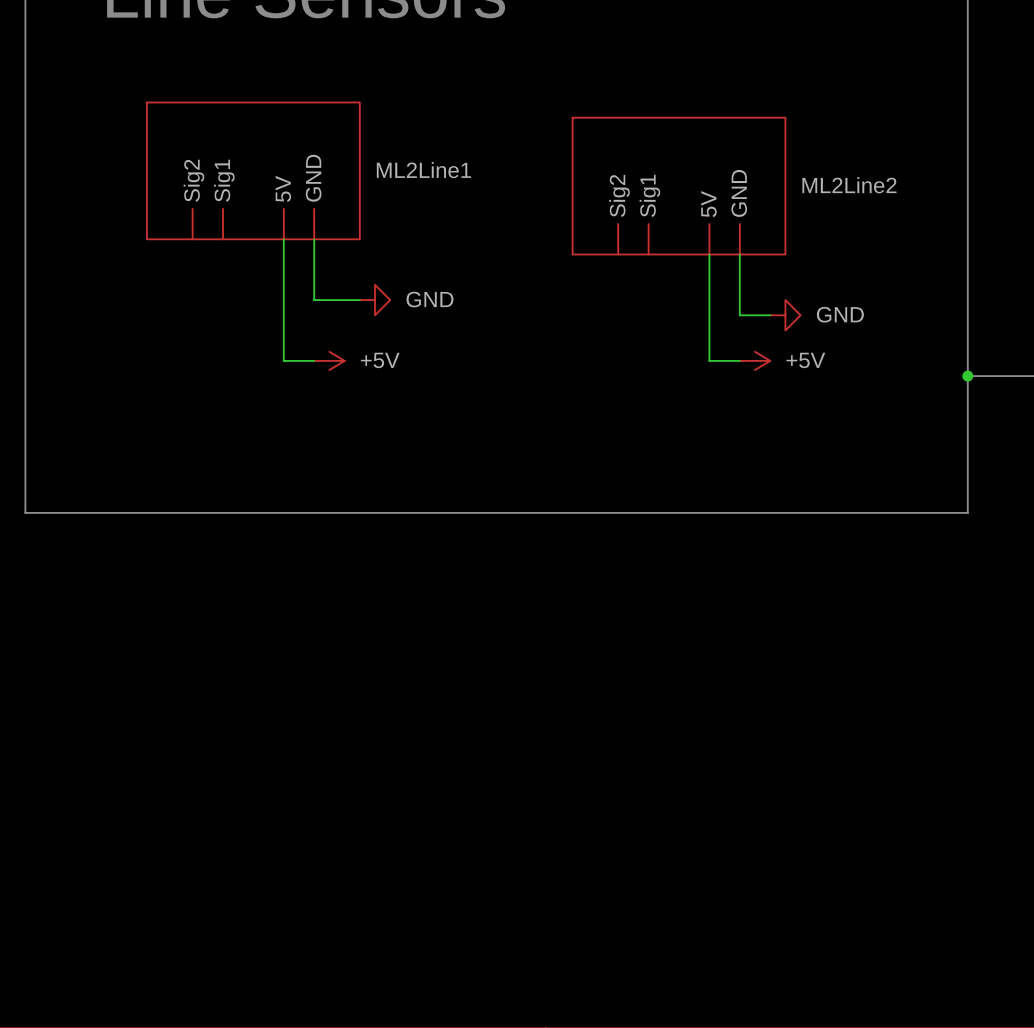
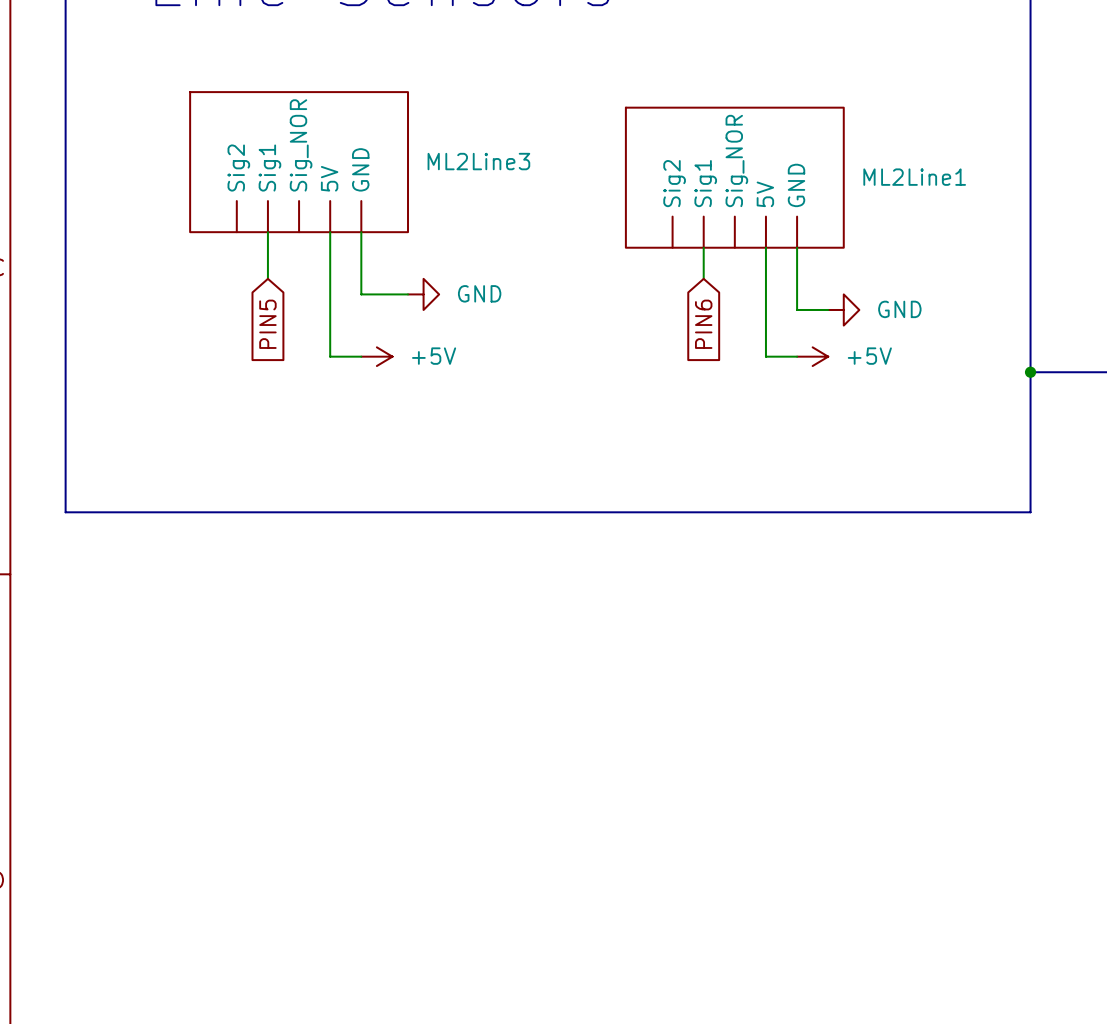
ML2Line1 symbol: [147, 102, 360, 240] -> [625, 107, 844, 248]
ML2Line3: none -> (299, 162)
ML2Line2: (679, 186) -> none
wire: none -> (267, 232) (267, 278)
wire: none -> (703, 247) (703, 278)
global label: none -> PIN5 (267, 324)
global label: none -> PIN6 (703, 324)

